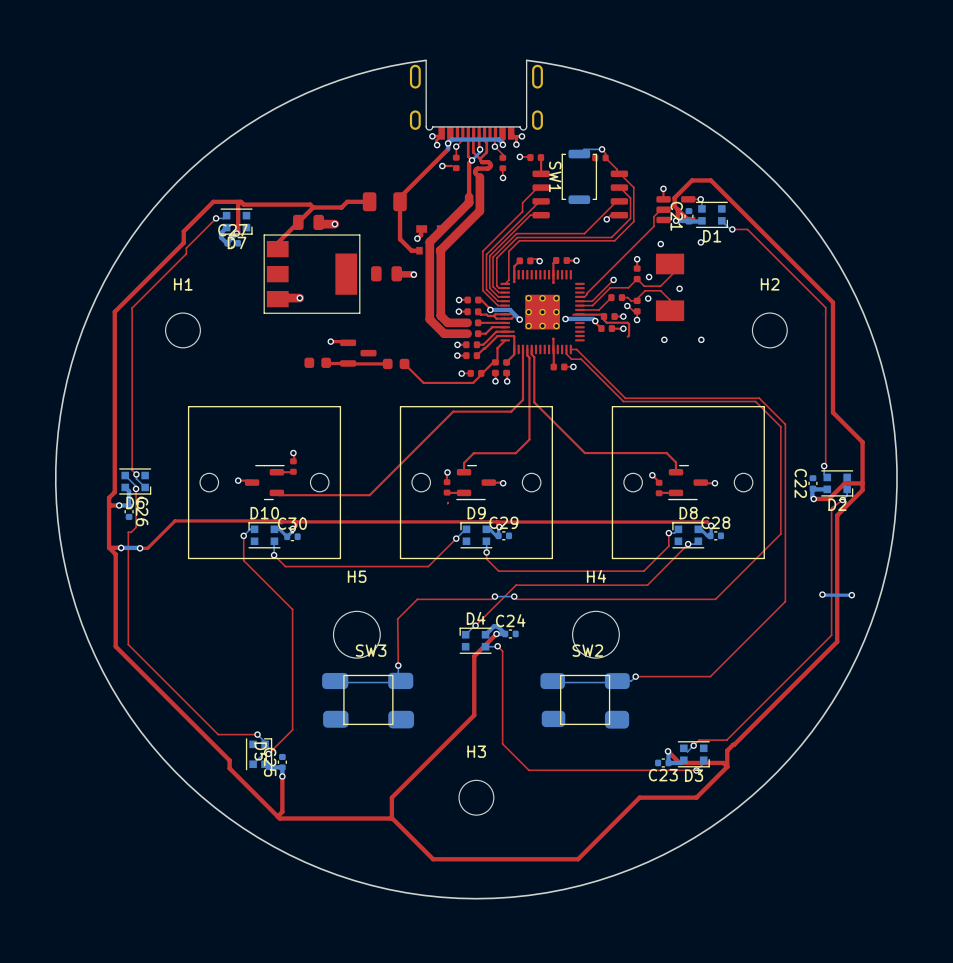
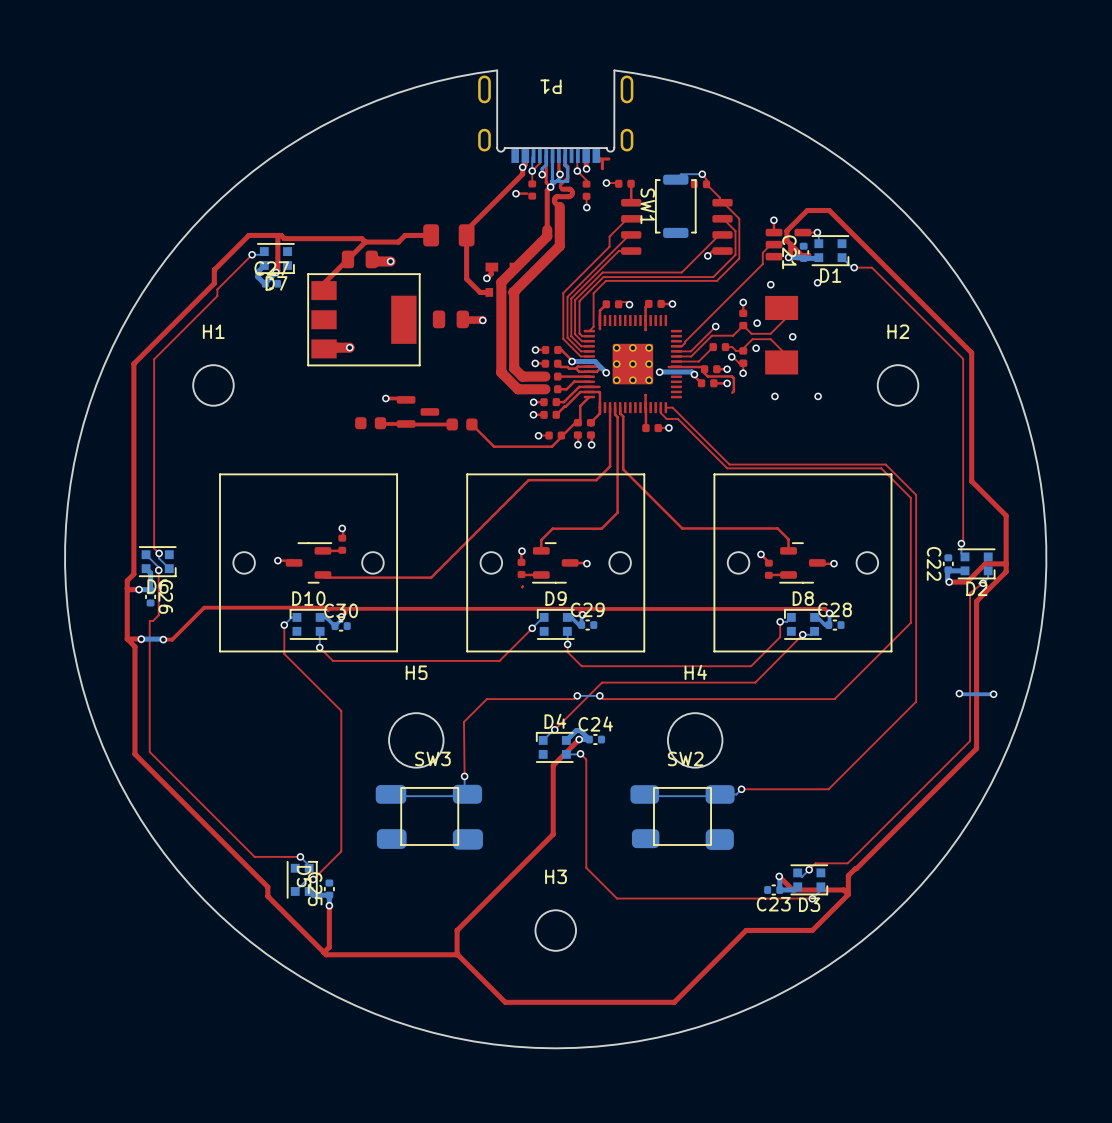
P1 side: top (476, 99) -> bottom (555, 116)
top track: (473, 132) (473, 152) (480, 159) -> none
bottom track: none -> (546, 155) (546, 164) (542, 168) (542, 174)
bottom track: none -> (564, 155) (567, 181) (551, 182) (552, 155)
bottom track: none -> (532, 156) (532, 171)
top track: (432, 136) (440, 136) (436, 140) (437, 145) -> none
via: (432, 136) -> none
via: (521, 136) -> none
bottom track: (502, 144) (498, 139) (451, 139) (448, 143) (448, 148) -> none
via: (516, 144) -> none
via: (437, 145) -> none
via: none -> (542, 174)

